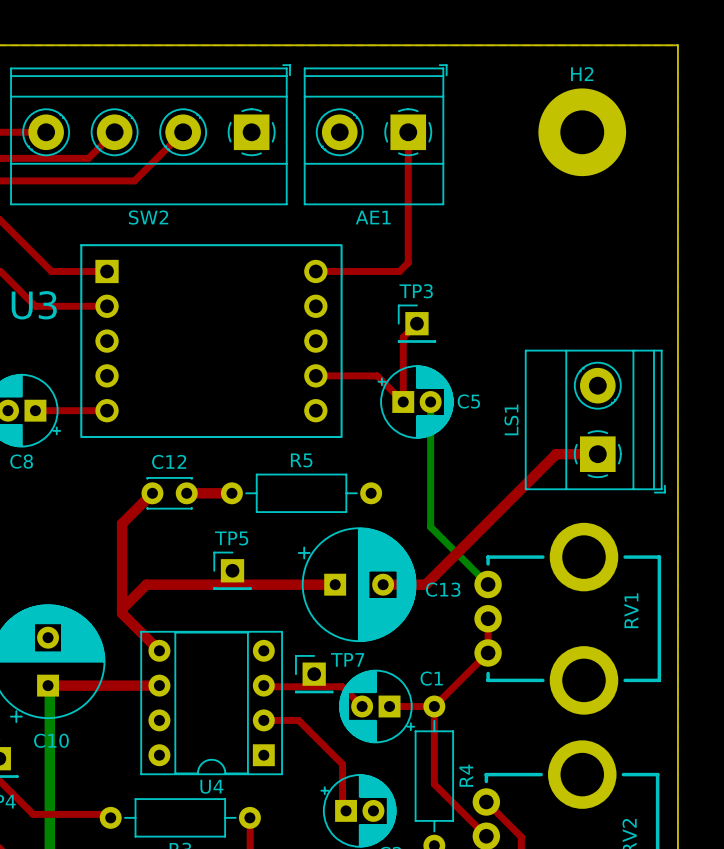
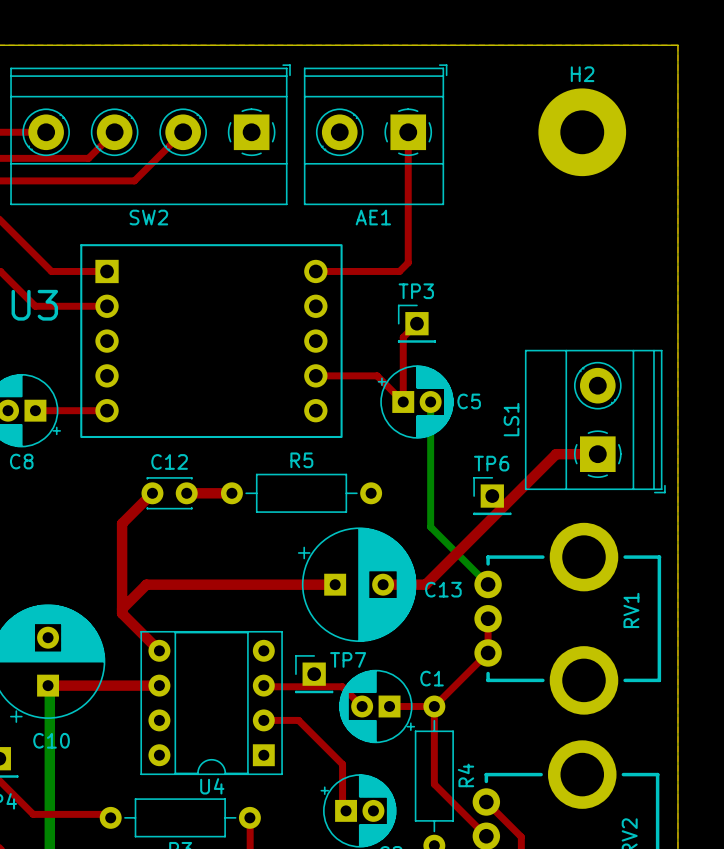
TP6: none -> (492, 496)
TP5: (232, 570) -> none

